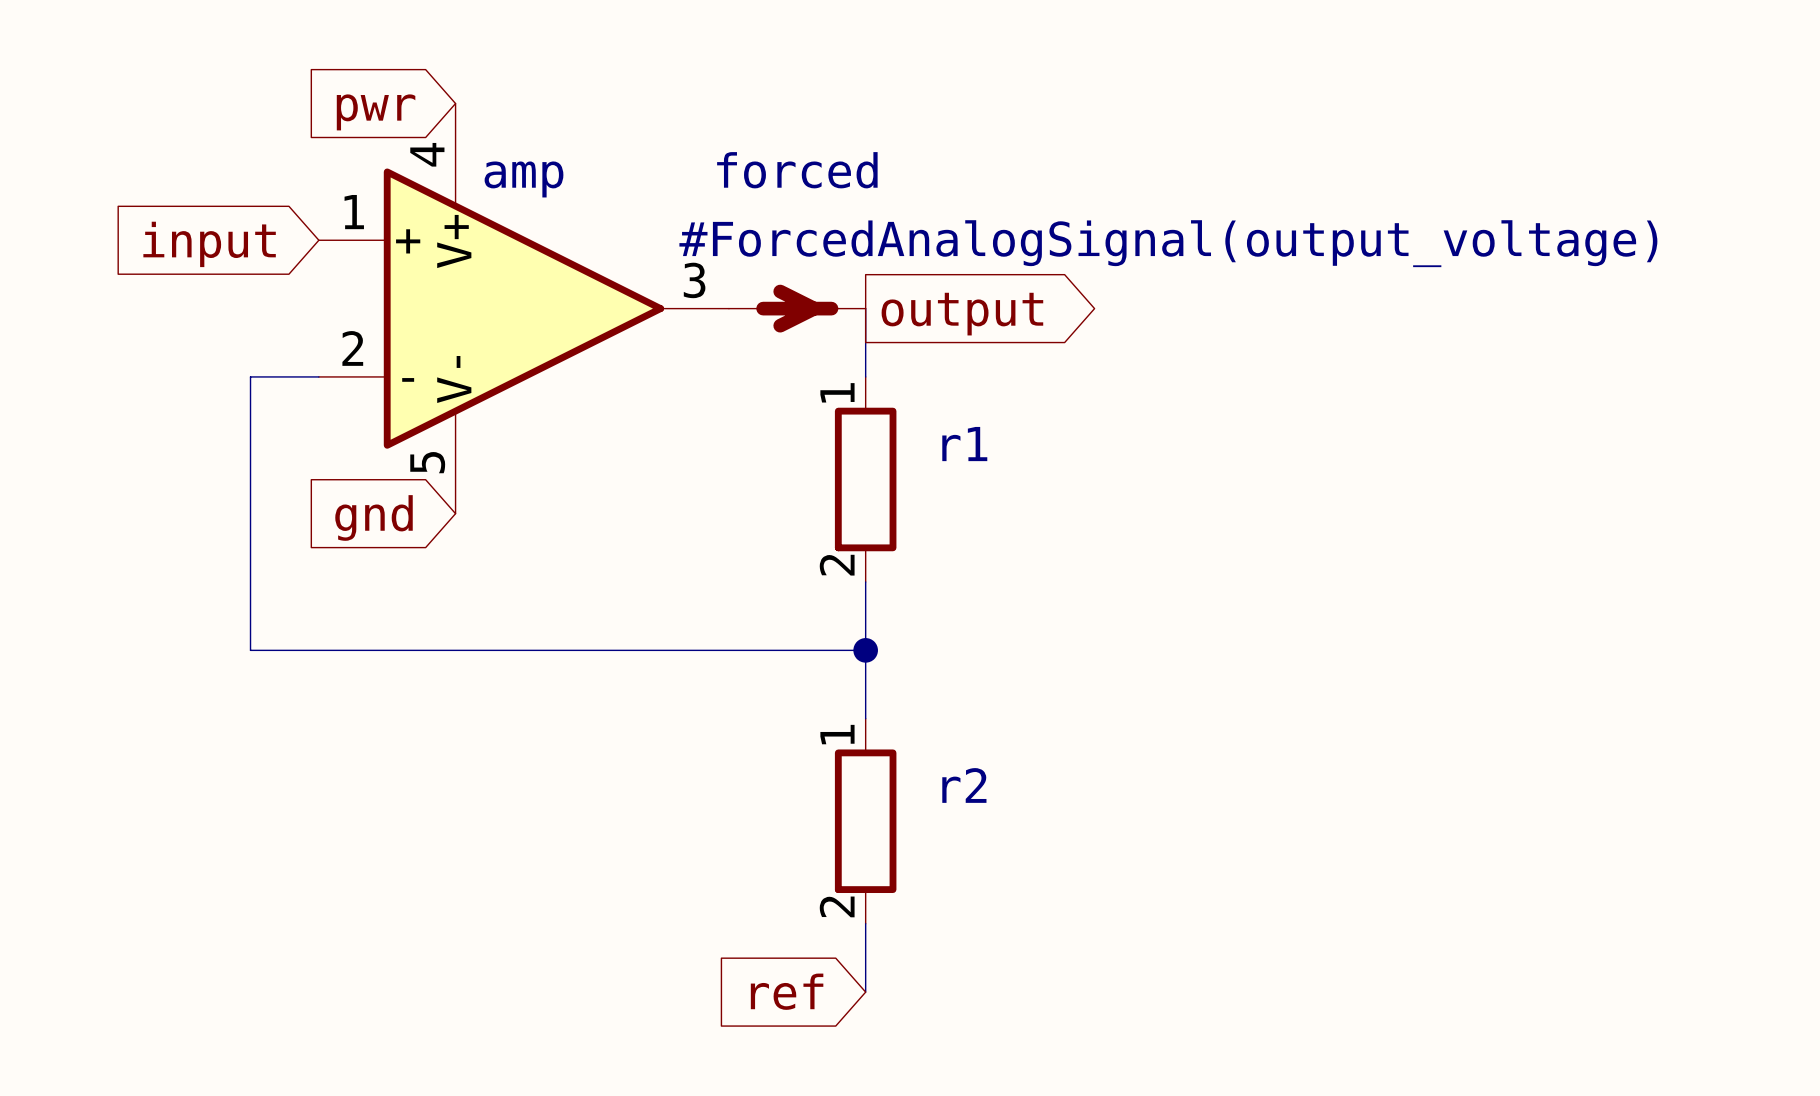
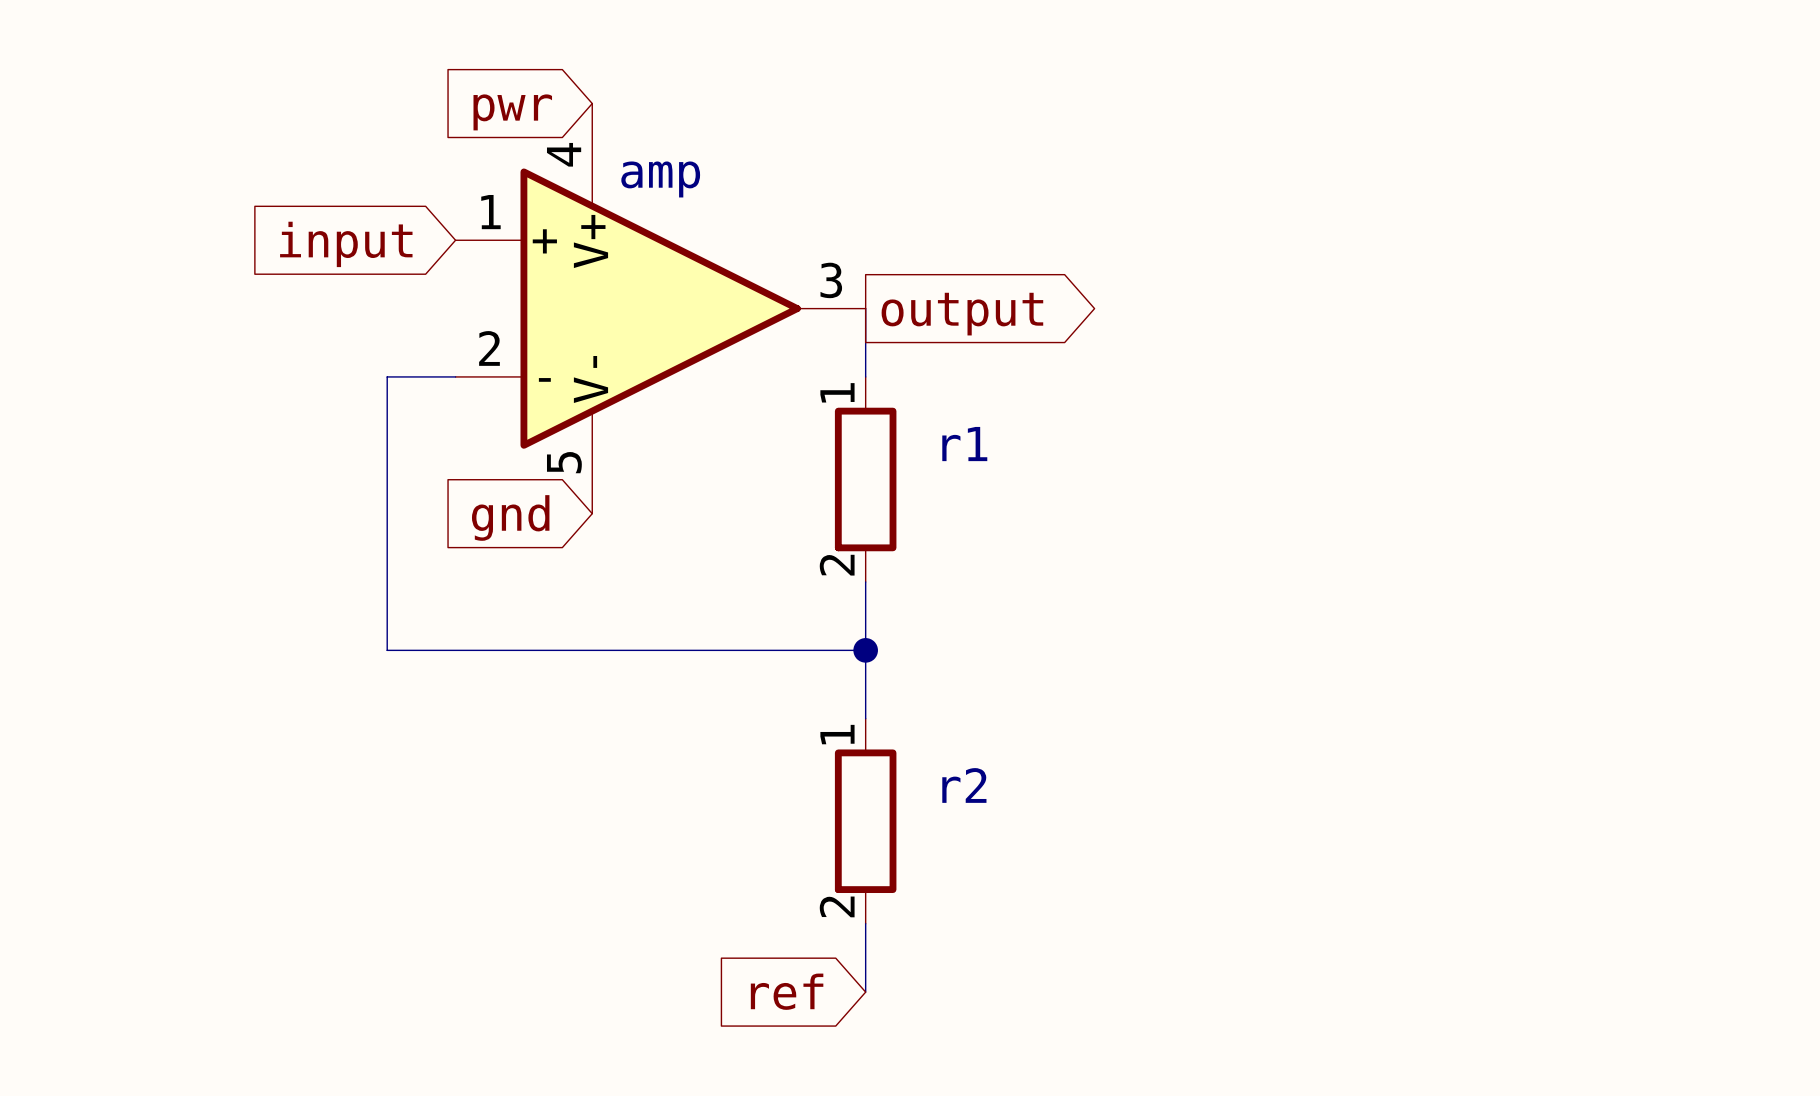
global label position: pwr (376, 112) -> pwr (512, 112)
global label position: input (209, 244) -> input (346, 244)
amp position: (523, 308) -> (660, 308)
forced: #ForcedAnalogSignal(output_voltage) (797, 308) -> none
wire: (318, 376) (250, 376) (250, 650) (387, 650) -> (455, 376) (387, 376) (387, 650)
global label position: gnd (374, 517) -> gnd (510, 517)

